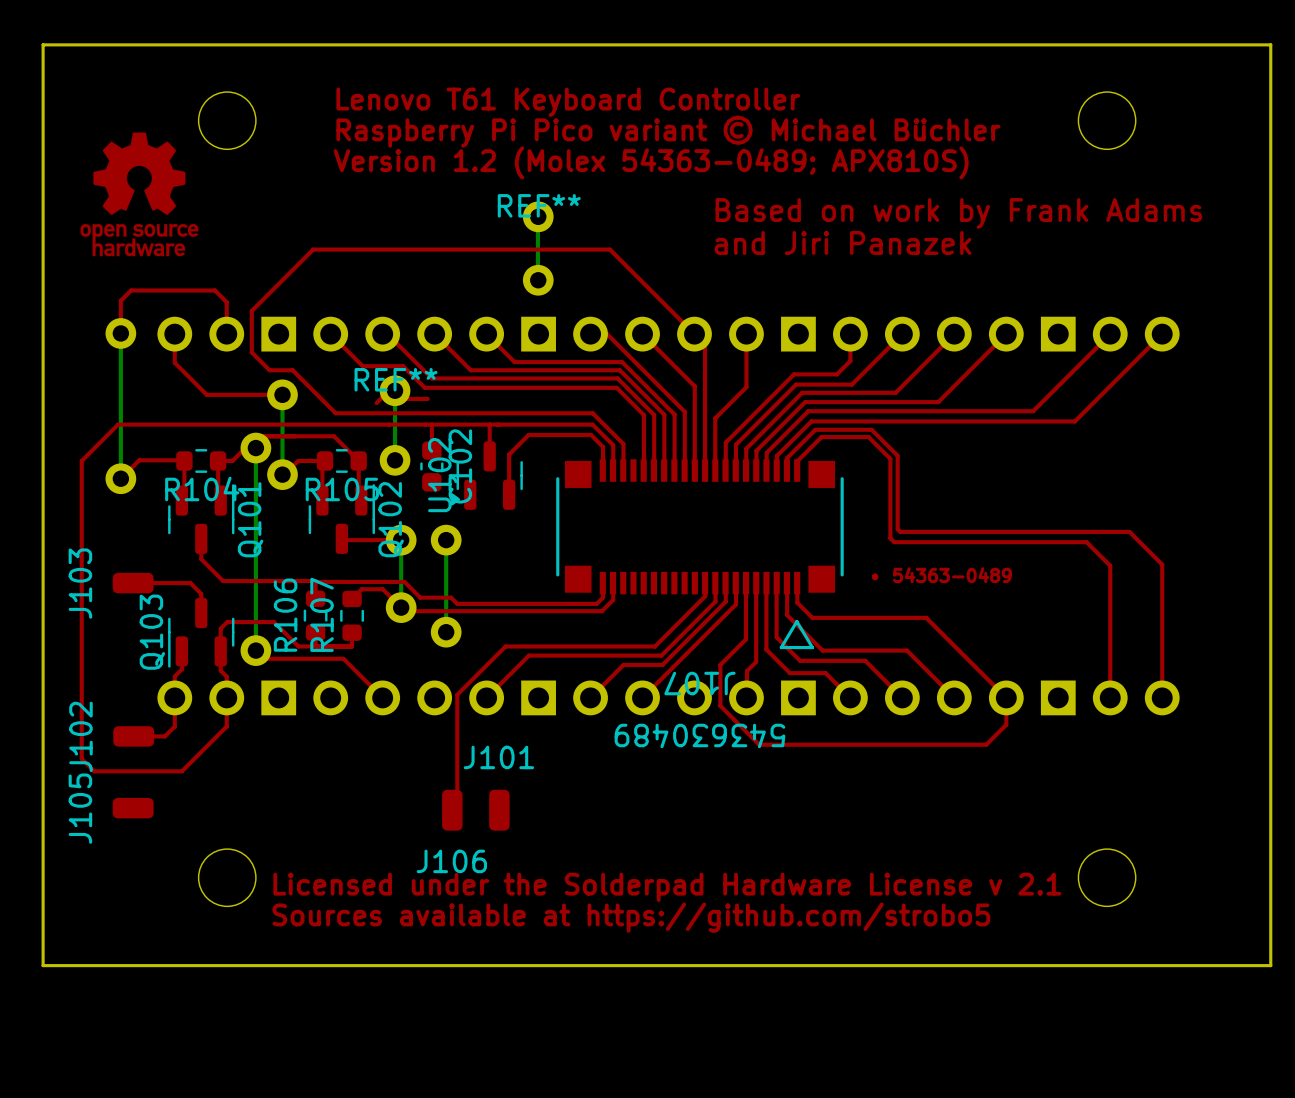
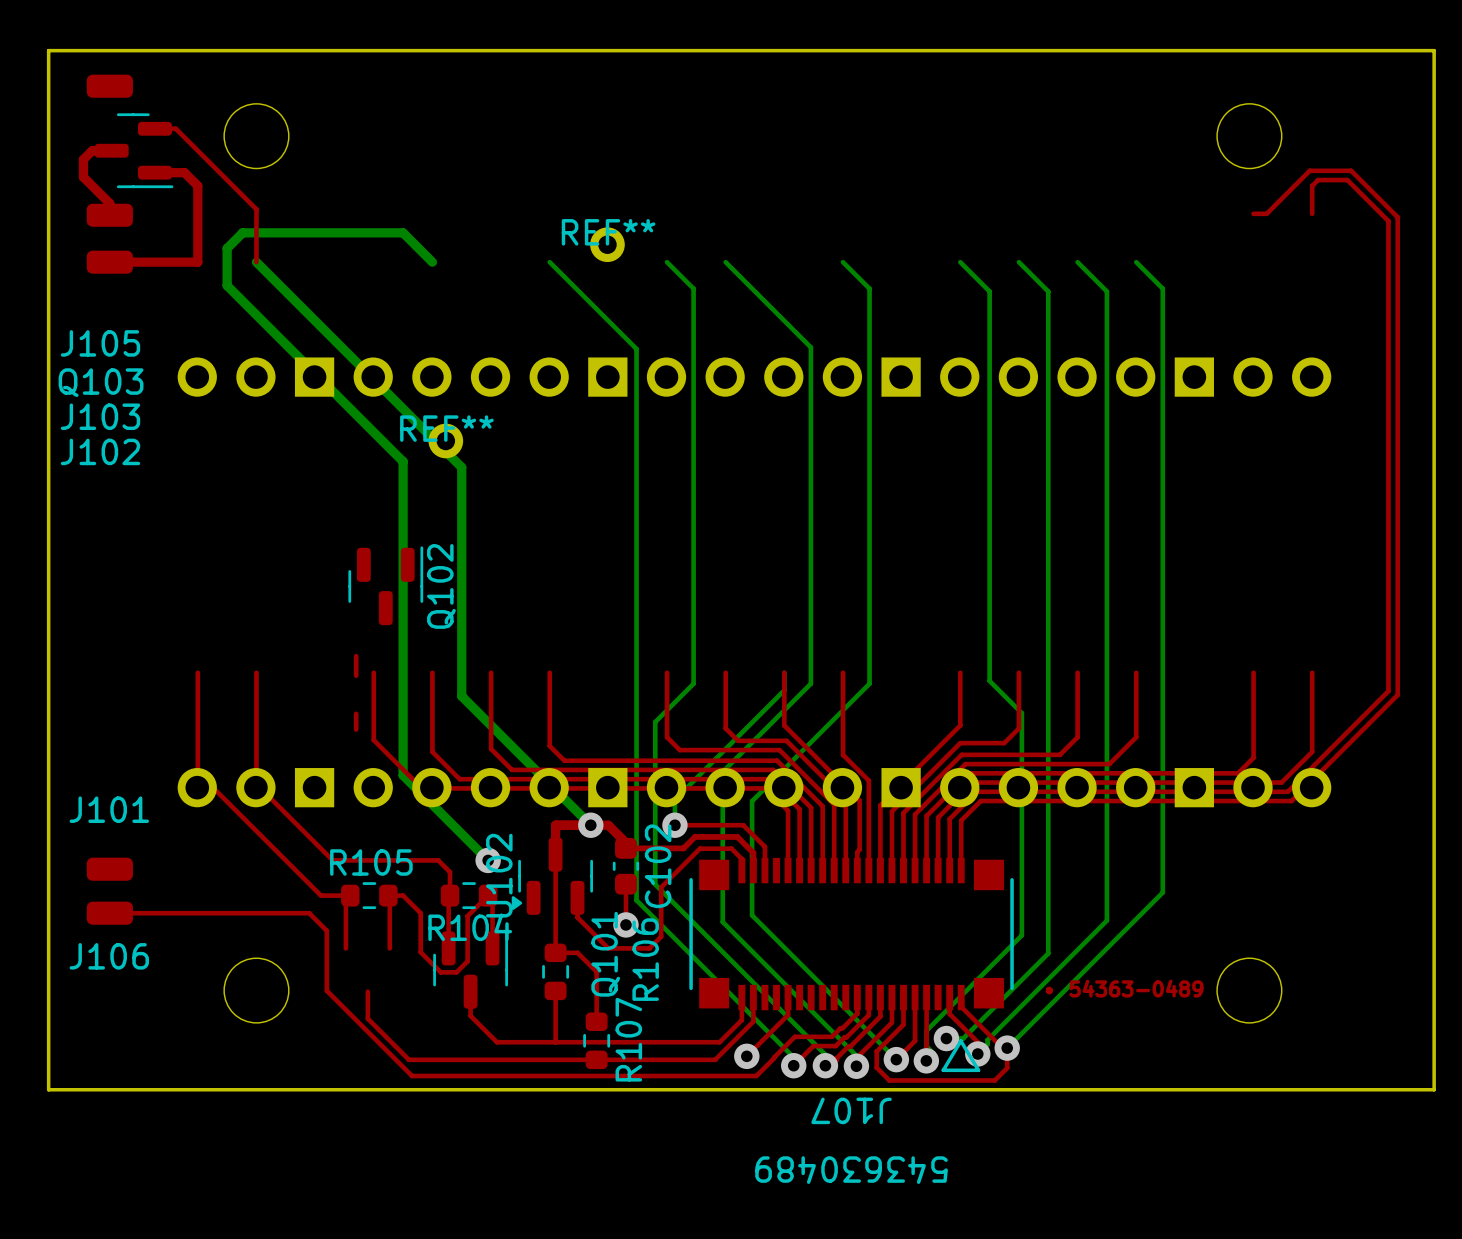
text: Lenovo T61 Keyboard Controller (568, 102) -> none
top track: none -> (154, 128) (175, 128) (256, 209) (256, 262)
text: Raspberry Pi Pico variant © Michael Büchler (668, 131) -> none
drawing: [80, 132, 199, 257] -> none
top track: none -> (111, 150) (92, 150) (83, 159) (83, 177) (109, 203) (109, 215)
top track: none -> (154, 172) (184, 172) (197, 185) (197, 262) (109, 262)
text: Version 1.2 (Molex 54363-0489; APX810S) (651, 162) -> none
top track: none -> (1253, 213) (1266, 213) (1309, 170) (1351, 170) (1397, 217) (1397, 694) (1291, 801) (980, 801) (961, 820) (961, 870)
top track: none -> (1312, 213) (1312, 185) (1318, 180) (1347, 180) (1388, 221) (1388, 691) (1287, 791) (976, 791) (949, 819) (949, 870)
text: Based on work by Frank Adams (958, 213) -> none
bottom track: (537, 221) (537, 278) -> none
bottom track: none -> (256, 262) (461, 467) (461, 696) (590, 825)
bottom track: none -> (432, 262) (403, 232) (242, 232) (227, 248) (227, 285) (403, 461) (403, 775) (488, 860)
bottom track: none -> (549, 262) (636, 348) (636, 900) (793, 1057) (793, 1065)
bottom track: none -> (667, 262) (693, 288) (693, 683) (655, 722) (655, 884) (825, 1054) (825, 1065)
bottom track: none -> (725, 262) (810, 347) (810, 683) (722, 771) (722, 922) (856, 1055) (856, 1066)
bottom track: none -> (843, 262) (869, 288) (869, 683) (752, 801) (752, 915) (896, 1059)
bottom track: none -> (960, 262) (989, 291) (989, 680) (1021, 713) (1021, 935) (926, 1030) (926, 1046) (933, 1053) (926, 1060)
bottom track: none -> (1018, 262) (1048, 291) (1048, 953) (963, 1038) (946, 1038)
bottom track: none -> (1077, 262) (1106, 291) (1106, 920) (987, 1039) (987, 1044) (977, 1054)
bottom track: none -> (1136, 262) (1162, 288) (1162, 892) (1007, 1048)
text: and Jiri Panazek (842, 242) -> none
part: (538, 280) -> none
top track: (120, 333) (120, 300) (131, 290) (214, 290) (226, 302) (226, 339) -> none
bottom track: (120, 333) (120, 478) -> none
part: (120, 333) -> none
top track: (174, 334) (174, 362) (206, 394) (282, 394) -> none
top track: (330, 334) (362, 366) (403, 366) (424, 387) (616, 387) (643, 415) (643, 470) -> none
top track: (382, 334) (387, 334) (431, 378) (617, 378) (654, 414) (654, 470) -> none
top track: (434, 334) (470, 370) (619, 370) (664, 414) (664, 470) -> none
top track: (486, 334) (514, 362) (622, 362) (674, 414) (674, 470) -> none
top track: (590, 334) (607, 334) (684, 411) (684, 470) -> none
top track: (642, 334) (694, 386) (694, 470) -> none
top track: (746, 334) (746, 387) (715, 418) (715, 470) -> none
top track: (850, 334) (850, 360) (836, 374) (794, 374) (725, 442) (725, 470) -> none
top track: (902, 334) (851, 384) (796, 384) (735, 444) (735, 470) -> none
top track: (954, 334) (895, 392) (802, 392) (746, 448) (746, 470) -> none
top track: (1006, 334) (938, 402) (805, 402) (756, 450) (756, 470) -> none
top track: (1110, 334) (1033, 411) (808, 411) (766, 452) (766, 470) -> none
top track: (1162, 334) (1074, 421) (811, 421) (776, 455) (776, 470) -> none
bottom track: (395, 390) (395, 460) -> none
bottom track: (282, 394) (282, 474) -> none
part: (282, 394) -> none
top track: (427, 398) (403, 398) (395, 390) (388, 390) (376, 403) -> none
top track: (431, 424) (431, 450) -> none
top track: (489, 424) (489, 456) -> none
bottom track: (255, 448) (255, 650) -> none
part: (255, 448) -> none
R104 position: (201, 460) -> (469, 895)
R105 position: (341, 460) -> (369, 895)
part: (395, 460) -> none
C102 position: (431, 466) -> (625, 866)
top track: (603, 470) (603, 446) (591, 434) (528, 434) (509, 454) (509, 494) -> none
top track: (613, 470) (613, 445) (592, 424) (118, 424) (81, 460) (81, 758) (94, 771) (181, 771) (226, 726) (226, 676) (220, 670) (220, 628) (227, 622) (274, 622) (298, 646) (351, 646) (351, 632) -> none
top track: (705, 470) (705, 344) (609, 249) (313, 249) (251, 310) (251, 352) (269, 370) (292, 370) (335, 413) (592, 413) (623, 444) (623, 470) -> none
top track: (787, 470) (787, 458) (815, 429) (871, 429) (897, 455) (897, 529) (900, 531) (1129, 531) (1162, 564) (1162, 697) -> none
top track: (797, 470) (797, 461) (821, 437) (868, 437) (890, 458) (890, 538) (894, 542) (1086, 542) (1110, 565) (1110, 697) -> none
top track: (282, 474) (298, 460) (324, 460) (322, 463) (322, 500) -> none
part: (282, 474) -> none
U102 position: (486, 475) -> (552, 876)
top track: (120, 478) (139, 460) (183, 460) (184, 498) (181, 500) -> none
part: (120, 478) -> none
R105 name position: R105 (342, 489) -> R105 (371, 862)
top track: (361, 500) (358, 497) (358, 460) (334, 436) (257, 436) (232, 460) (218, 460) (218, 498) (220, 500) -> none
Q101 position: (201, 519) -> (470, 969)
Q101 name position: Q101 (250, 519) -> Q101 (605, 954)
top track: (201, 538) (201, 559) (223, 581) (404, 581) (420, 597) (451, 597) (457, 603) (596, 603) (603, 597) (603, 583) -> none
top track: (341, 538) (401, 540) -> none
bottom track: (401, 540) (401, 607) -> none
part: (401, 540) -> none
bottom track: (446, 540) (446, 632) -> none
part: (446, 540) -> none
J107 position: (699, 554) -> (851, 964)
text position: • 54363-0489 (941, 575) -> • 54363-0489 (1124, 988)
J103 name rotation: 0° (80, 583) -> 90° clockwise (100, 416)
J103 name position: J103 (80, 583) -> J103 (100, 416)
top track: (133, 583) (190, 583) (201, 593) (201, 613) -> none
J103 position: (133, 583) -> (109, 215)
top track: (613, 583) (613, 599) (601, 611) (404, 611) (382, 589) (361, 589) (352, 599) -> none
top track: (705, 583) (705, 596) (654, 646) (505, 646) (457, 694) (457, 805) (452, 810) -> none
top track: (715, 583) (715, 601) (661, 655) (528, 655) (486, 697) -> none
top track: (725, 583) (725, 601) (662, 664) (623, 664) (590, 697) -> none
top track: (735, 583) (735, 604) (642, 697) -> none
top track: (745, 583) (745, 639) (720, 664) (720, 705) -> (549, 672) (549, 746) (564, 760) (777, 760) (812, 796)
top track: (756, 583) (756, 661) (746, 671) (746, 697) -> none
top track: (766, 583) (766, 649) (789, 673) (825, 673) (850, 697) -> none
top track: (776, 583) (776, 637) (800, 660) (865, 660) (902, 697) -> none
top track: (787, 583) (787, 615) (822, 650) (907, 650) (954, 697) -> none
top track: (797, 583) (797, 602) (812, 617) (926, 617) (1006, 697) (1006, 724) (986, 744) (759, 744) (728, 714) -> (822, 870) (822, 806)
top track: none -> (197, 672) (197, 772) (320, 895) (350, 895) (345, 900) (345, 948)
top track: none -> (256, 672) (256, 784) (332, 860) (438, 860) (450, 872) (448, 948)
top track: none -> (373, 672) (373, 740) (422, 788) (765, 788) (788, 810) (788, 870)
top track: none -> (432, 672) (432, 751) (459, 779) (769, 779) (799, 809) (799, 870)
top track: none -> (491, 672) (491, 748) (512, 769) (773, 769) (811, 807) (811, 870)
top track: none -> (667, 672) (667, 737) (679, 750) (779, 750) (834, 804) (834, 870)
top track: none -> (725, 672) (725, 728) (738, 740) (786, 740) (845, 800) (845, 870)
top track: none -> (784, 672) (784, 725) (859, 800) (859, 849) (857, 852) (857, 870)
bottom track: none -> (784, 672) (784, 690) (674, 799) (674, 825)
top track: none -> (843, 672) (843, 754) (868, 780) (868, 870)
top track: none -> (960, 672) (960, 725) (880, 805) (880, 870)
top track: none -> (1018, 672) (1018, 728) (1004, 743) (960, 743) (891, 811) (891, 870)
top track: none -> (1077, 672) (1077, 737) (1060, 754) (961, 754) (903, 812) (903, 870)
top track: none -> (1136, 672) (1136, 737) (1109, 764) (965, 764) (915, 814) (915, 870)
top track: none -> (1253, 672) (1253, 757) (1238, 773) (969, 773) (926, 816) (926, 870)
top track: none -> (1312, 672) (1312, 751) (1281, 782) (973, 782) (938, 817) (938, 870)
part: (401, 607) -> none
R107 name position: R107 (322, 614) -> R107 (628, 1039)
R106 name position: R106 (285, 615) -> R106 (645, 959)
R106 position: (315, 615) -> (555, 971)
R107 position: (352, 615) -> (596, 1040)
Q103 name position: Q103 (152, 632) -> Q103 (101, 382)
Q103 rotation: 0° (201, 632) -> 90° counterclockwise (134, 150)
Q103 position: (201, 632) -> (134, 150)
part: (446, 632) -> none
top track: (255, 650) (264, 658) (343, 658) (382, 697) -> none
part: (255, 650) -> none
top track: (181, 651) (182, 669) (174, 676) (174, 726) (164, 736) (133, 736) -> none
via: none -> (590, 825)
top track: none -> (674, 825) (743, 825) (764, 846) (764, 870)
via: none -> (674, 825)
J102 name rotation: 0° (80, 736) -> 90° clockwise (100, 451)
J102 name position: J102 (80, 736) -> J102 (100, 451)
J102 position: (133, 736) -> (109, 262)
via: none -> (488, 860)
top track: none -> (741, 870) (741, 859) (731, 848) (699, 848) (661, 887) (661, 936) (649, 948) (608, 948) (577, 917) (577, 897)
top track: none -> (753, 870) (753, 852) (737, 836) (695, 836) (683, 848) (625, 848) (625, 842) (608, 825) (555, 825) (555, 952) (577, 952) (596, 971) (596, 1021)
top track: none -> (625, 884) (625, 924)
J105 name rotation: 0° (80, 808) -> 90° clockwise (100, 343)
J105 name position: J105 (80, 808) -> J105 (100, 343)
J105 position: (133, 808) -> (109, 86)
top track: none -> (109, 913) (309, 913) (326, 930) (326, 990) (412, 1076) (756, 1076) (794, 1036) (831, 1036) (857, 1013) (857, 997)
J106 rotation: 0° (452, 810) -> 90° clockwise (109, 913)
J106 position: (452, 810) -> (109, 913)
J101 rotation: 0° (499, 810) -> 90° clockwise (109, 869)
J101 position: (499, 810) -> (109, 869)
via: none -> (625, 924)
top track: none -> (389, 948) (388, 895) (403, 895) (420, 913) (420, 952) (440, 972) (456, 972) (467, 961) (467, 916) (488, 895) (492, 900) (492, 948)
top track: none -> (367, 991) (367, 1018) (408, 1059) (715, 1059) (753, 1021) (753, 997)
top track: none -> (470, 991) (470, 1015) (496, 1042) (719, 1042) (741, 1020) (741, 997)
top track: none -> (555, 990) (555, 1042)
top track: none -> (788, 997) (788, 1015) (746, 1056)
top track: none -> (868, 997) (868, 1015) (846, 1037) (835, 1046) (813, 1046) (793, 1065)
top track: none -> (880, 997) (880, 1016) (831, 1065) (825, 1065)
top track: none -> (891, 997) (891, 1022) (856, 1058) (856, 1066)
top track: none -> (903, 997) (903, 1024) (876, 1051) (876, 1067) (889, 1080) (994, 1080) (1007, 1068) (1007, 1048) (1002, 1048) (961, 1006) (961, 997)
top track: none -> (915, 997) (915, 1040) (896, 1059)
top track: none -> (926, 997) (926, 1060)
top track: none -> (949, 997) (949, 1014) (977, 1042) (977, 1054)
text: Licensed under the Solderpad Hardware License v 2.1 (667, 887) -> none
text: Sources available at https://github.com/strobo5 (631, 917) -> none
via: none -> (946, 1038)
via: none -> (1007, 1048)
via: none -> (977, 1054)
via: none -> (746, 1056)
via: none -> (896, 1059)
via: none -> (926, 1060)
via: none -> (793, 1065)
via: none -> (825, 1065)
via: none -> (856, 1066)

